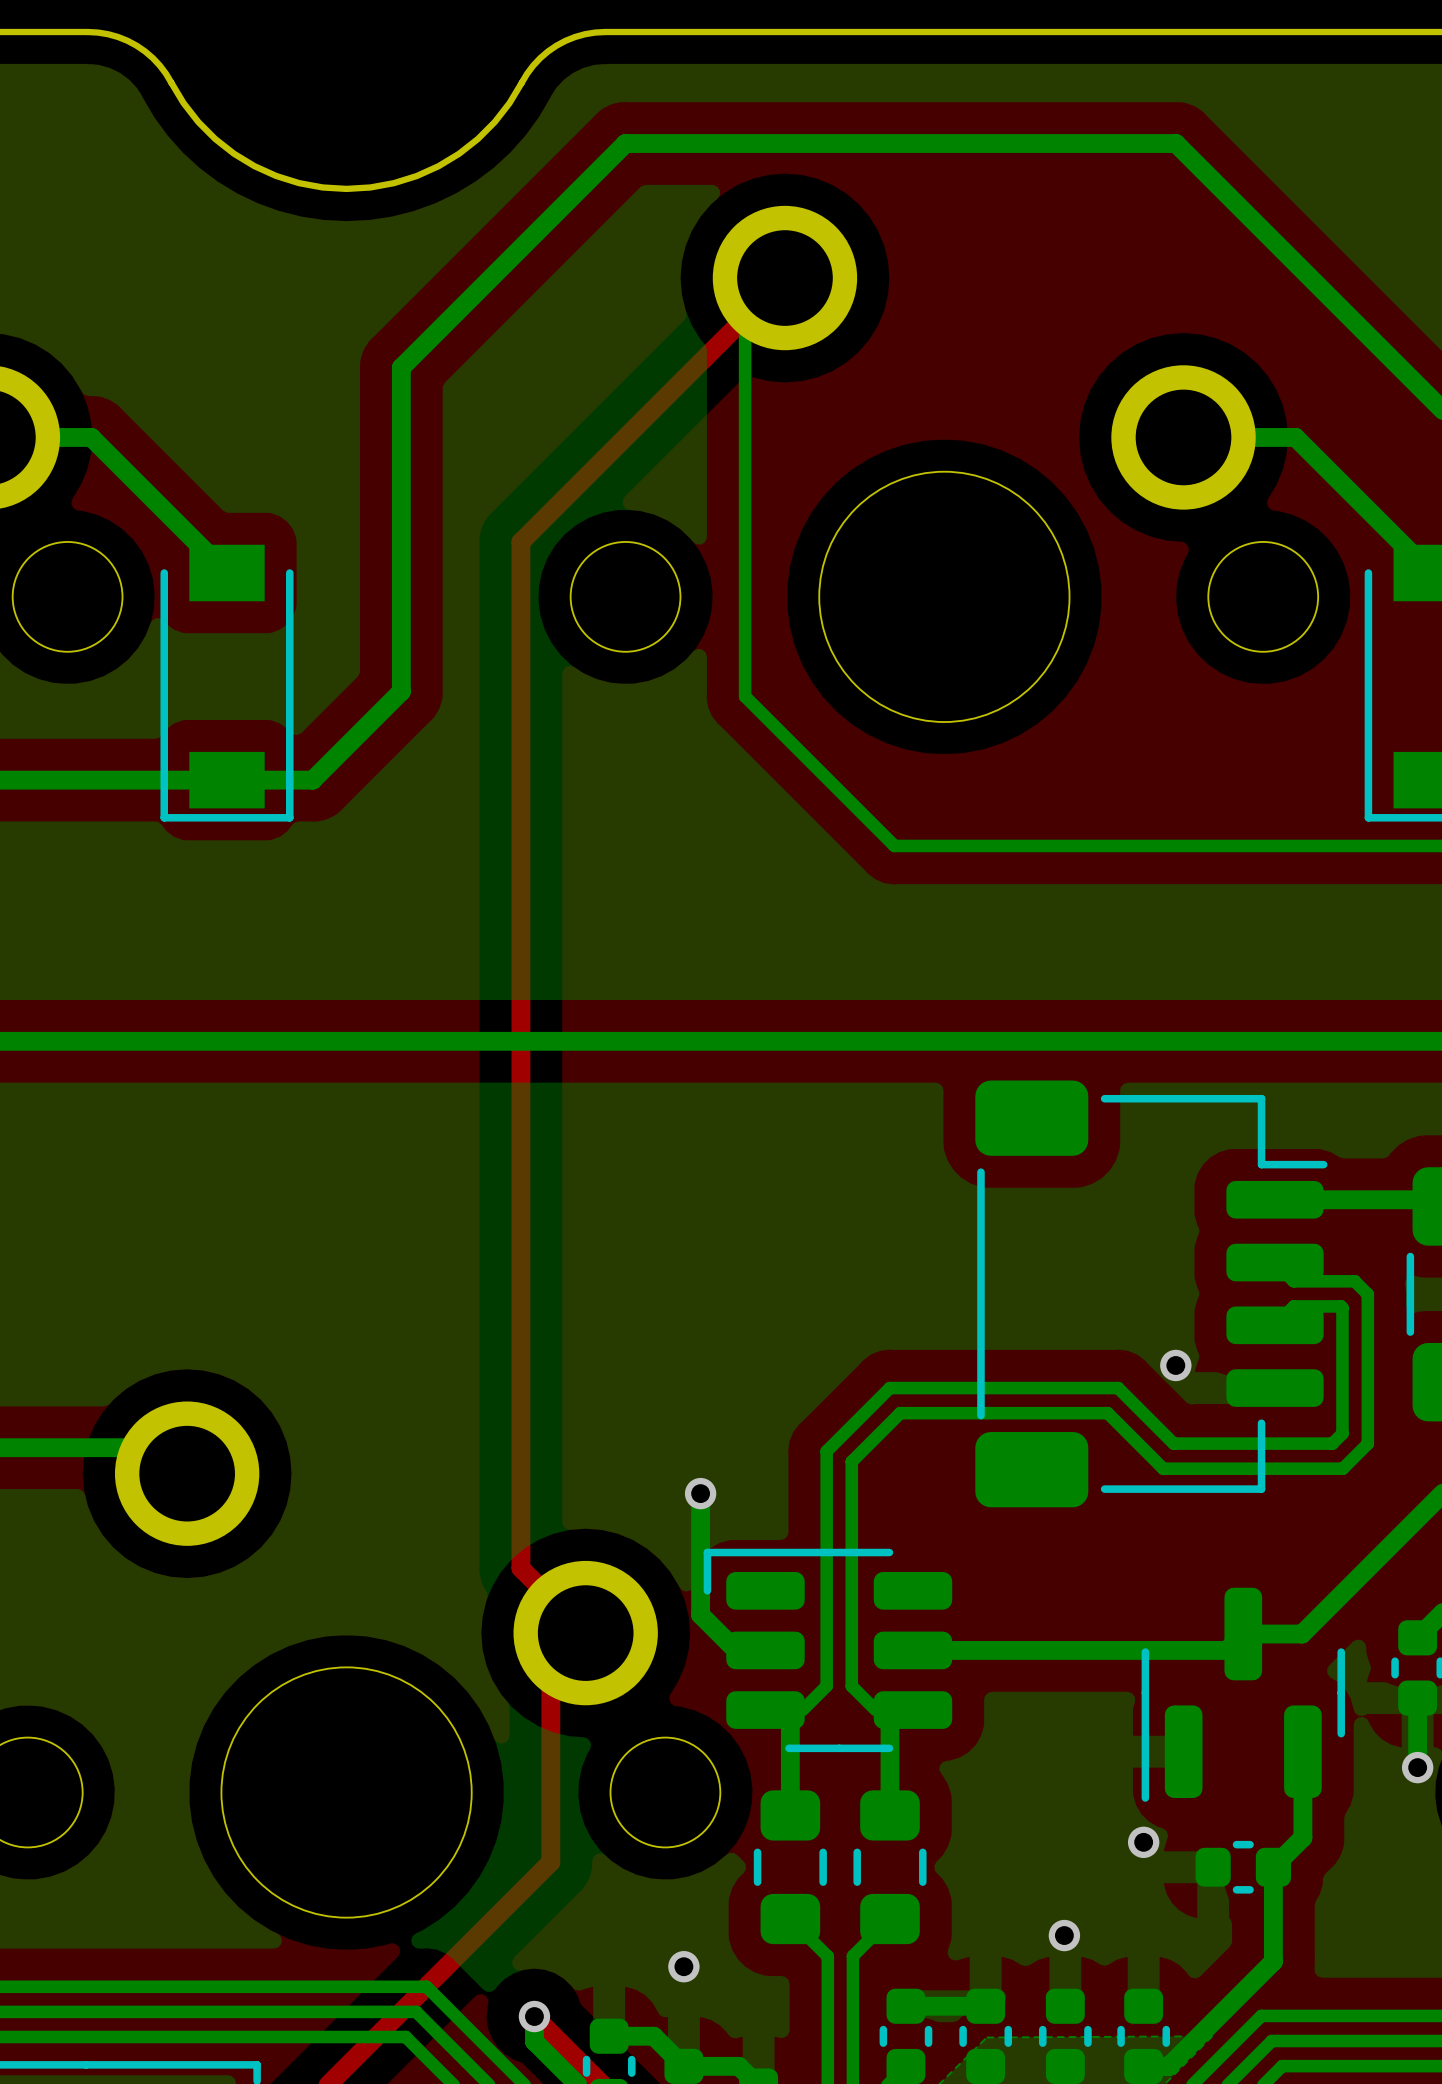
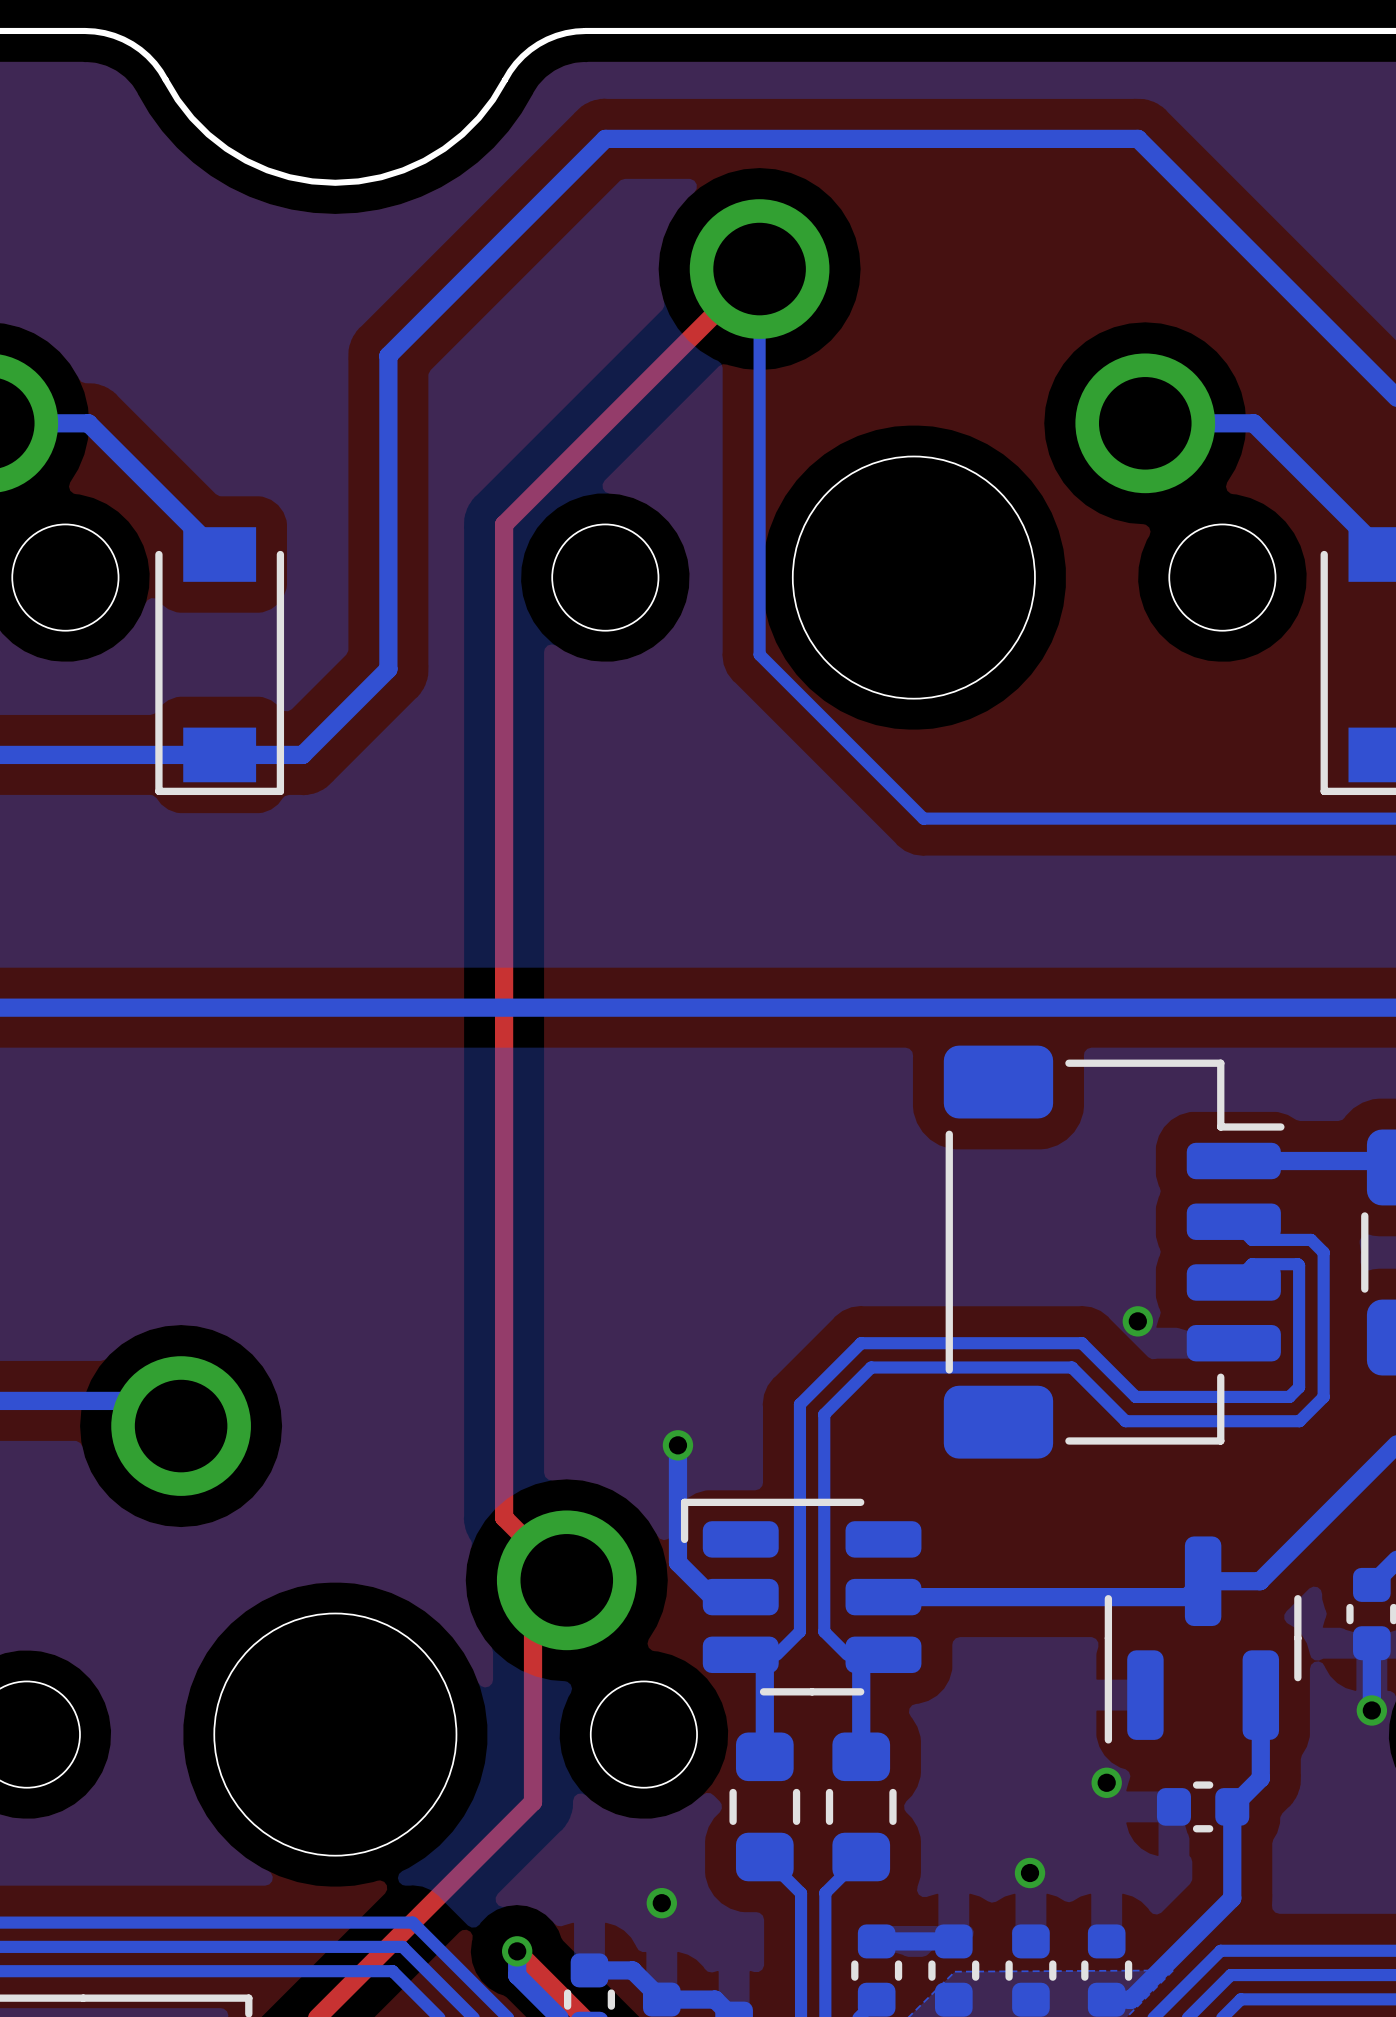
bottom track: (784, 278) (745, 317) (745, 696) (894, 845) (954, 845) -> (759, 269) (759, 654) (923, 818)

